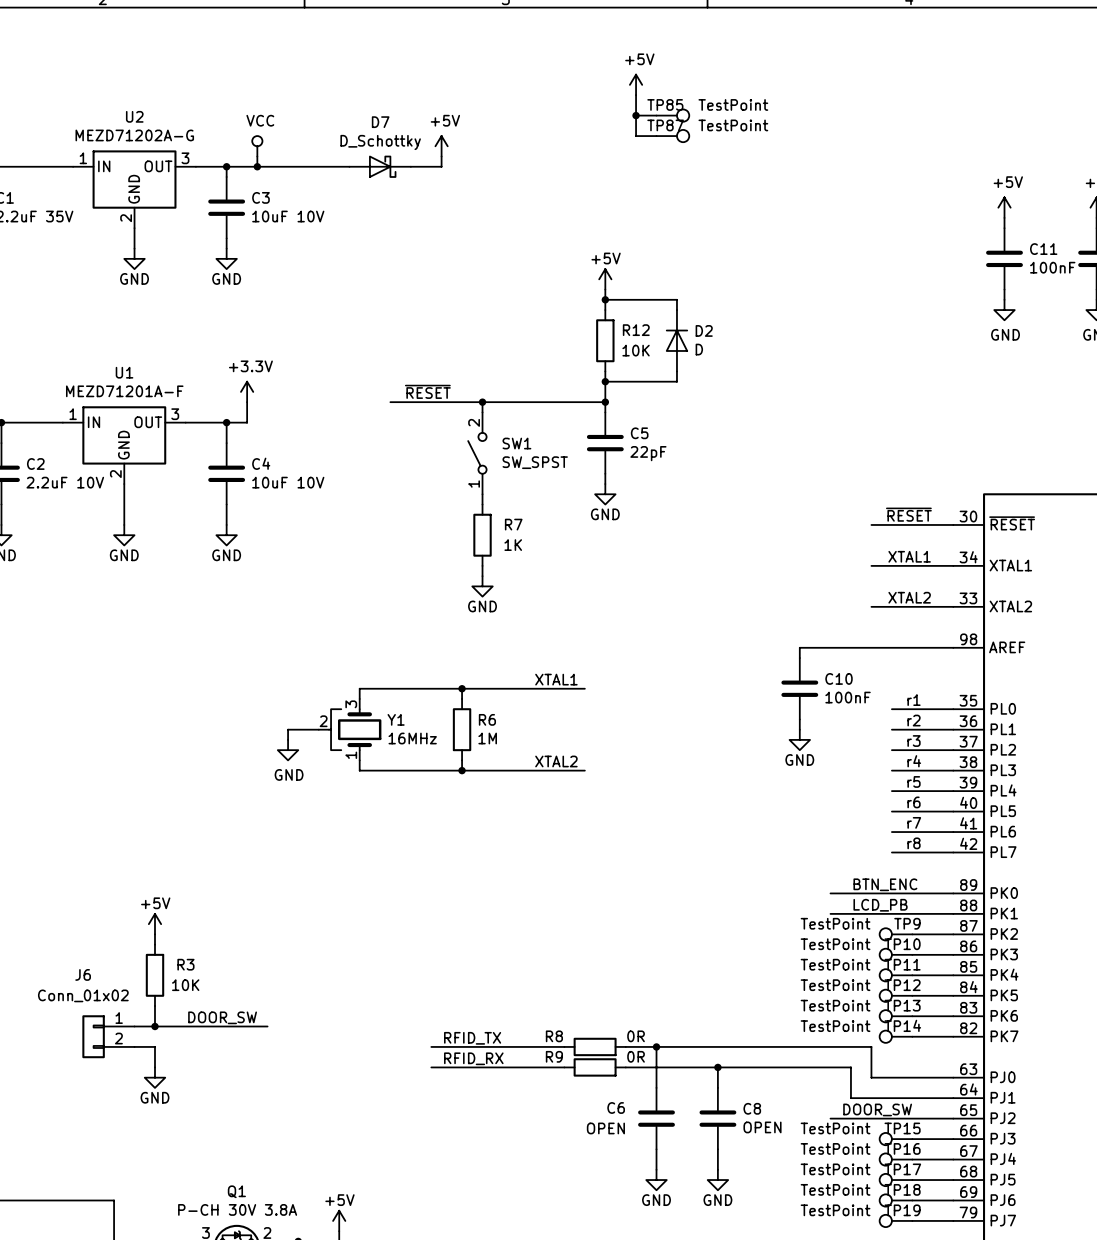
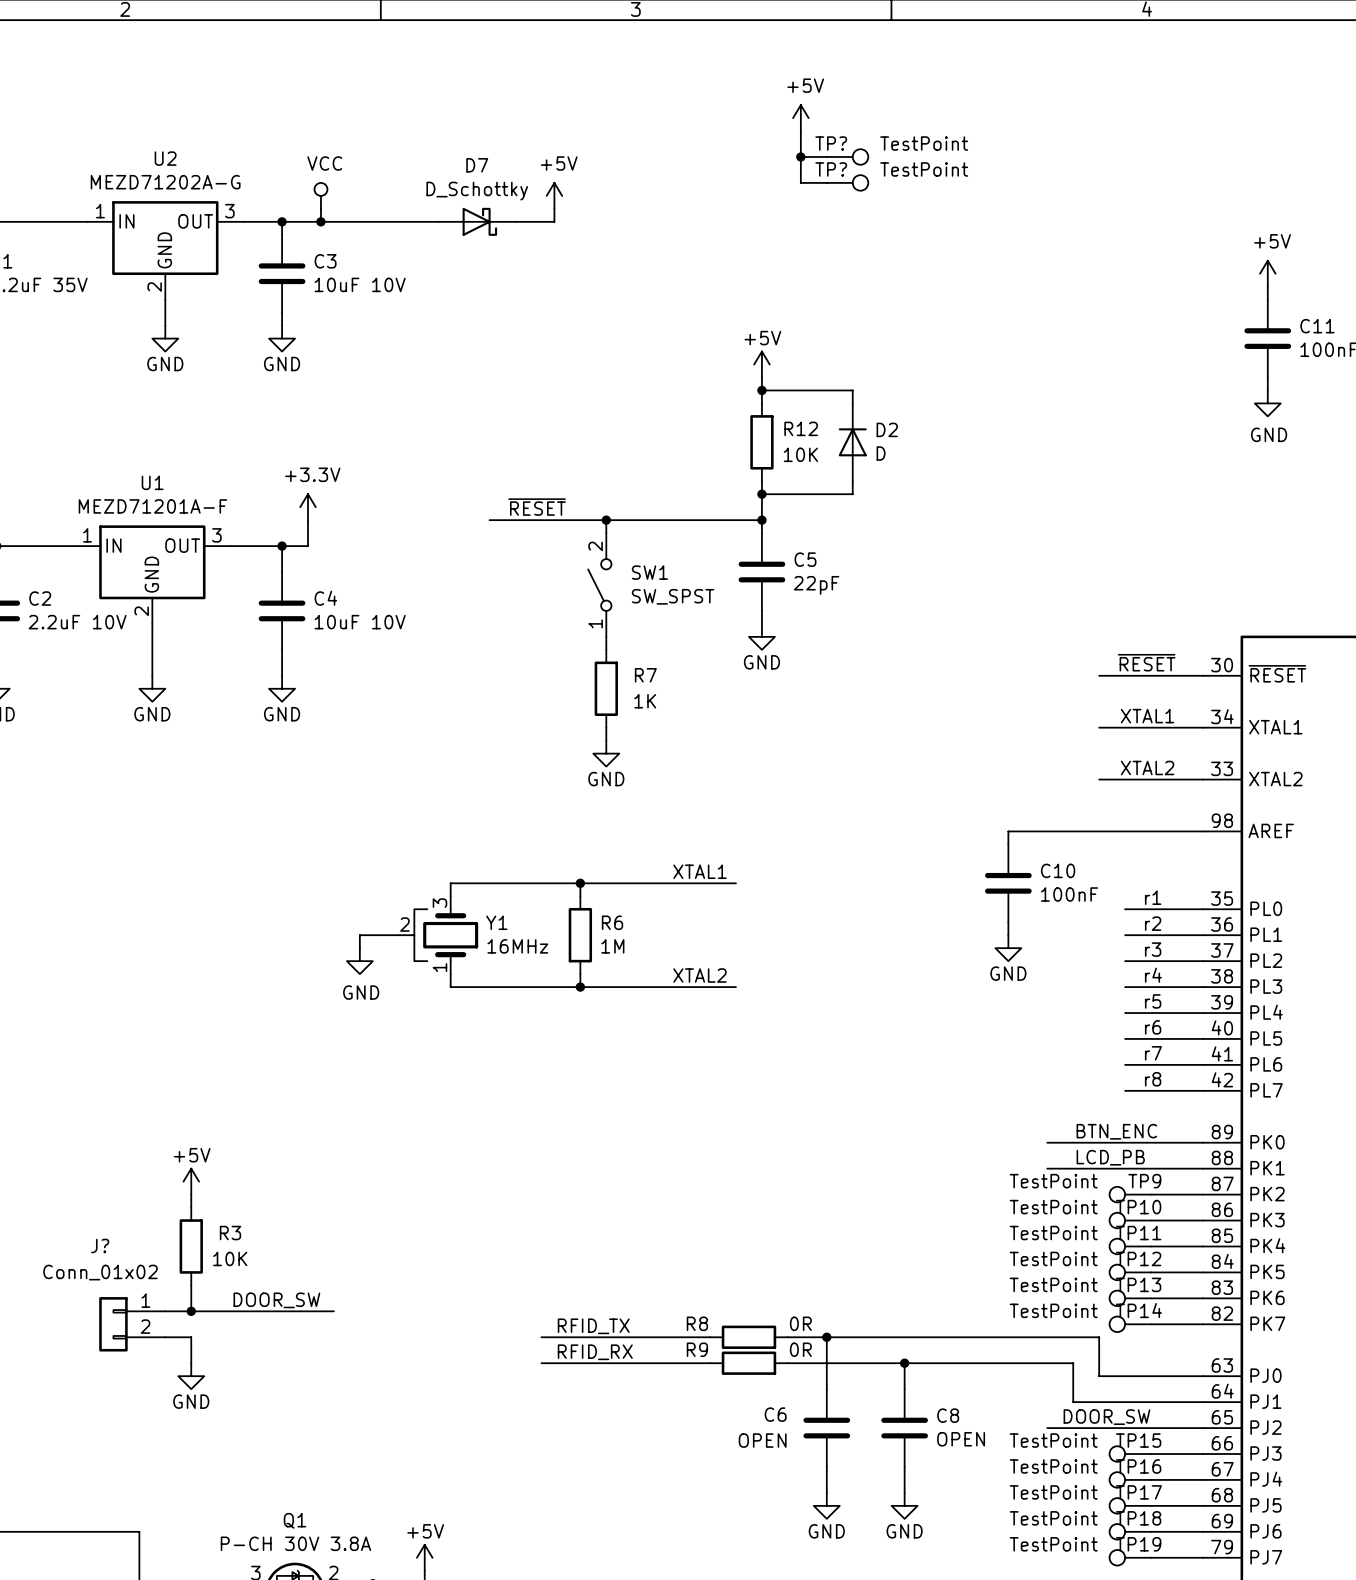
TP85 name: TP85 (665, 104) -> TP? (831, 143)
TP87 name: TP87 (665, 125) -> TP? (831, 169)
J6 name: J6 (83, 974) -> J? (100, 1246)

